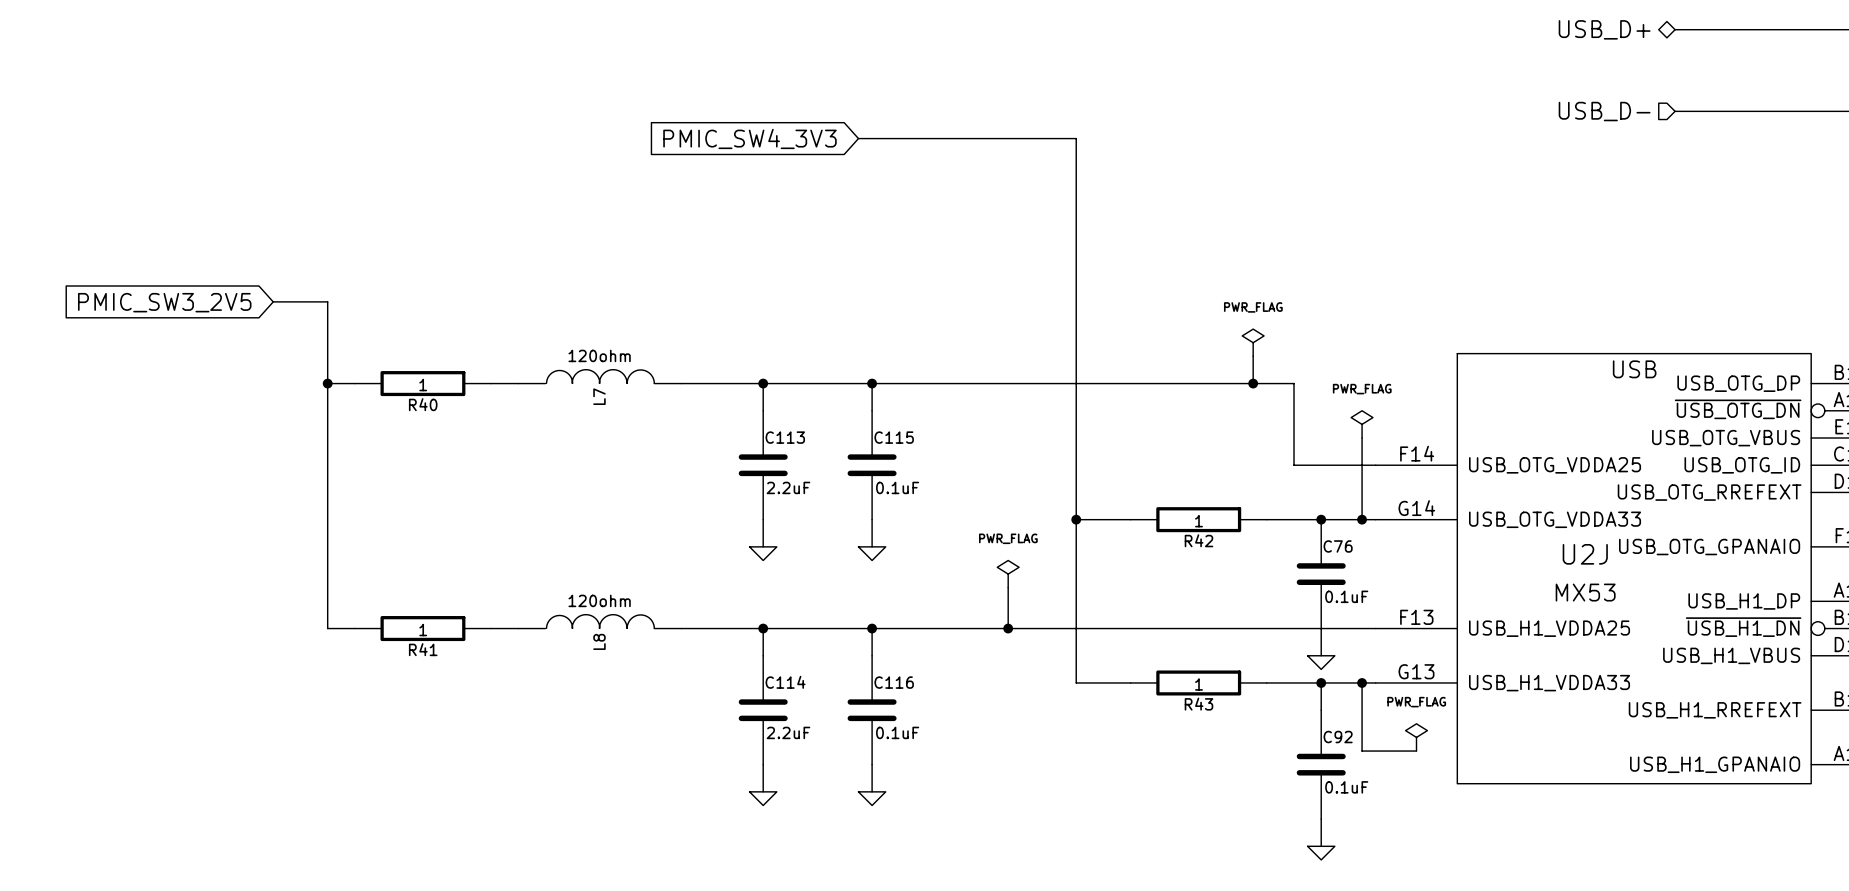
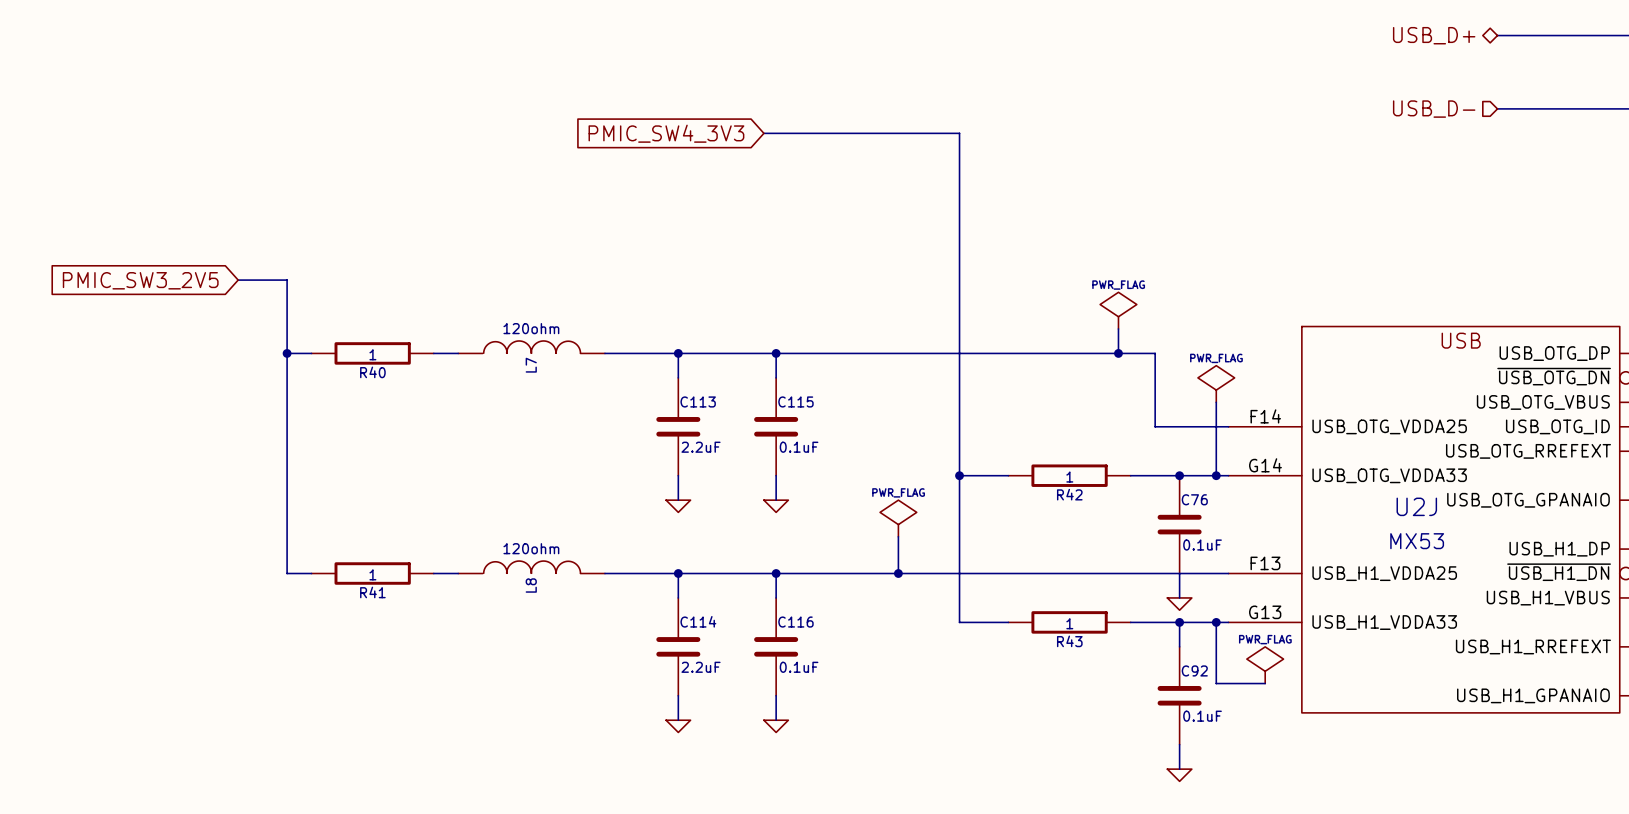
power symbol shape: [1242, 329, 1265, 357] -> [1100, 292, 1137, 329]
power symbol shape: [1351, 410, 1373, 439] -> [1197, 365, 1235, 403]
power symbol shape: [997, 560, 1020, 588] -> [880, 500, 917, 537]
power symbol shape: [1405, 723, 1428, 752] -> [1246, 646, 1284, 684]

